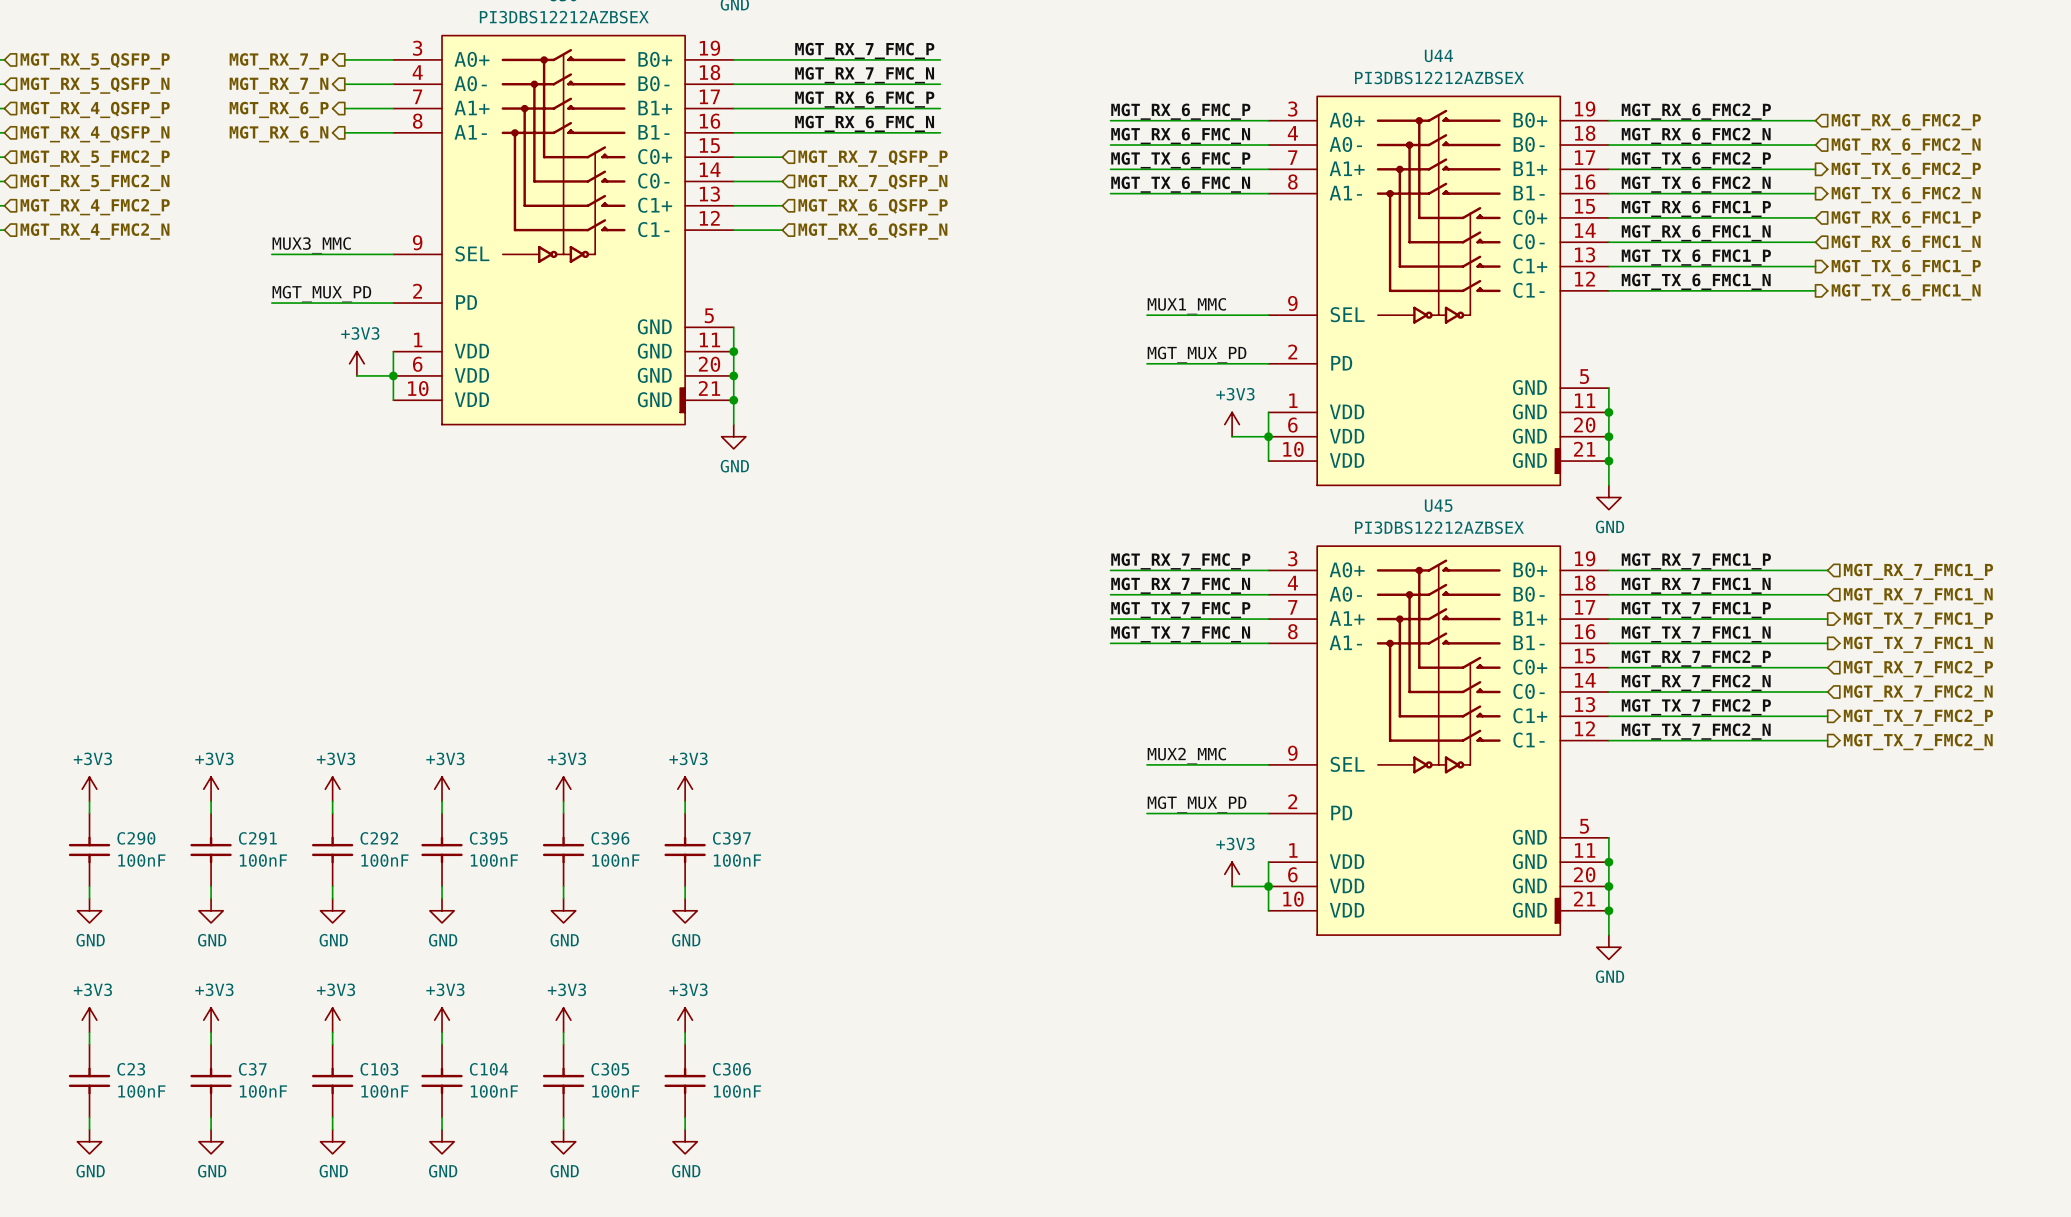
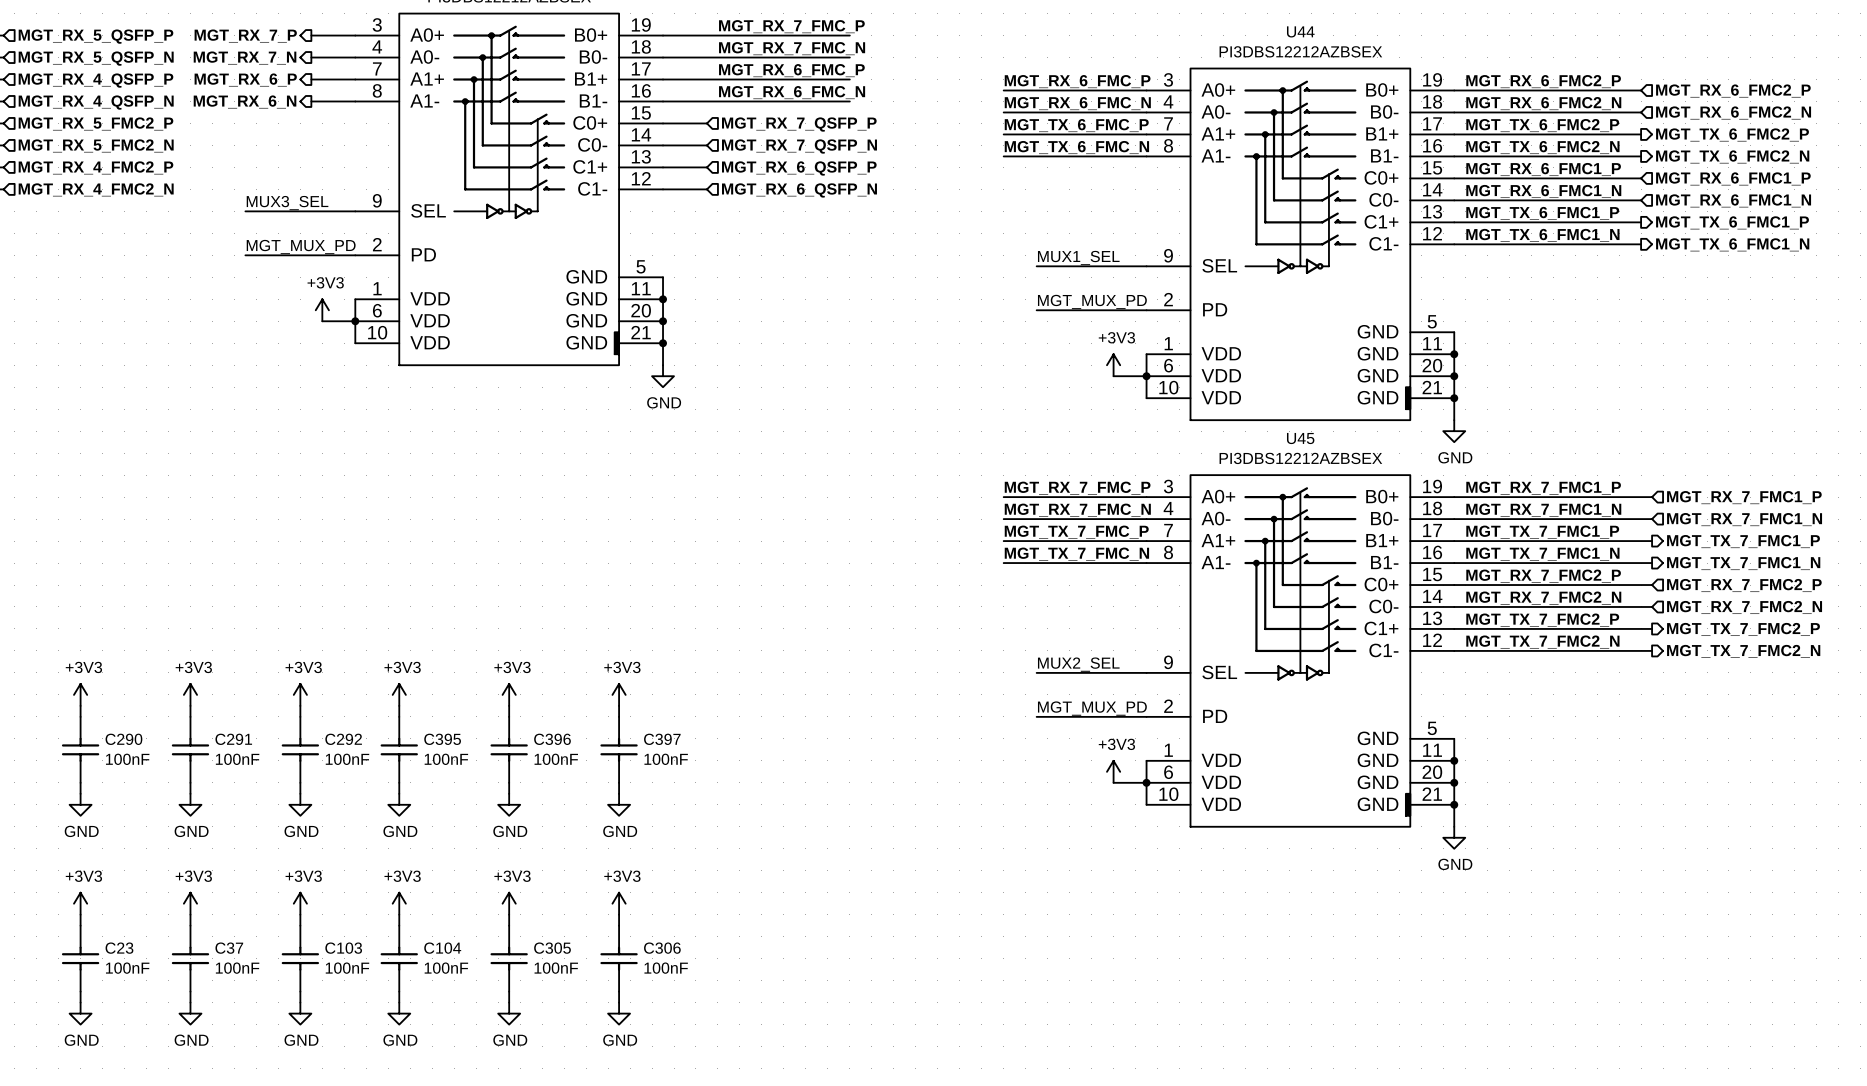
label: MUX3_MMC (311, 245) -> MUX3_SEL (287, 203)
label: MUX1_MMC (1186, 306) -> MUX1_SEL (1078, 258)
label: MUX2_MMC (1186, 755) -> MUX2_SEL (1078, 664)

